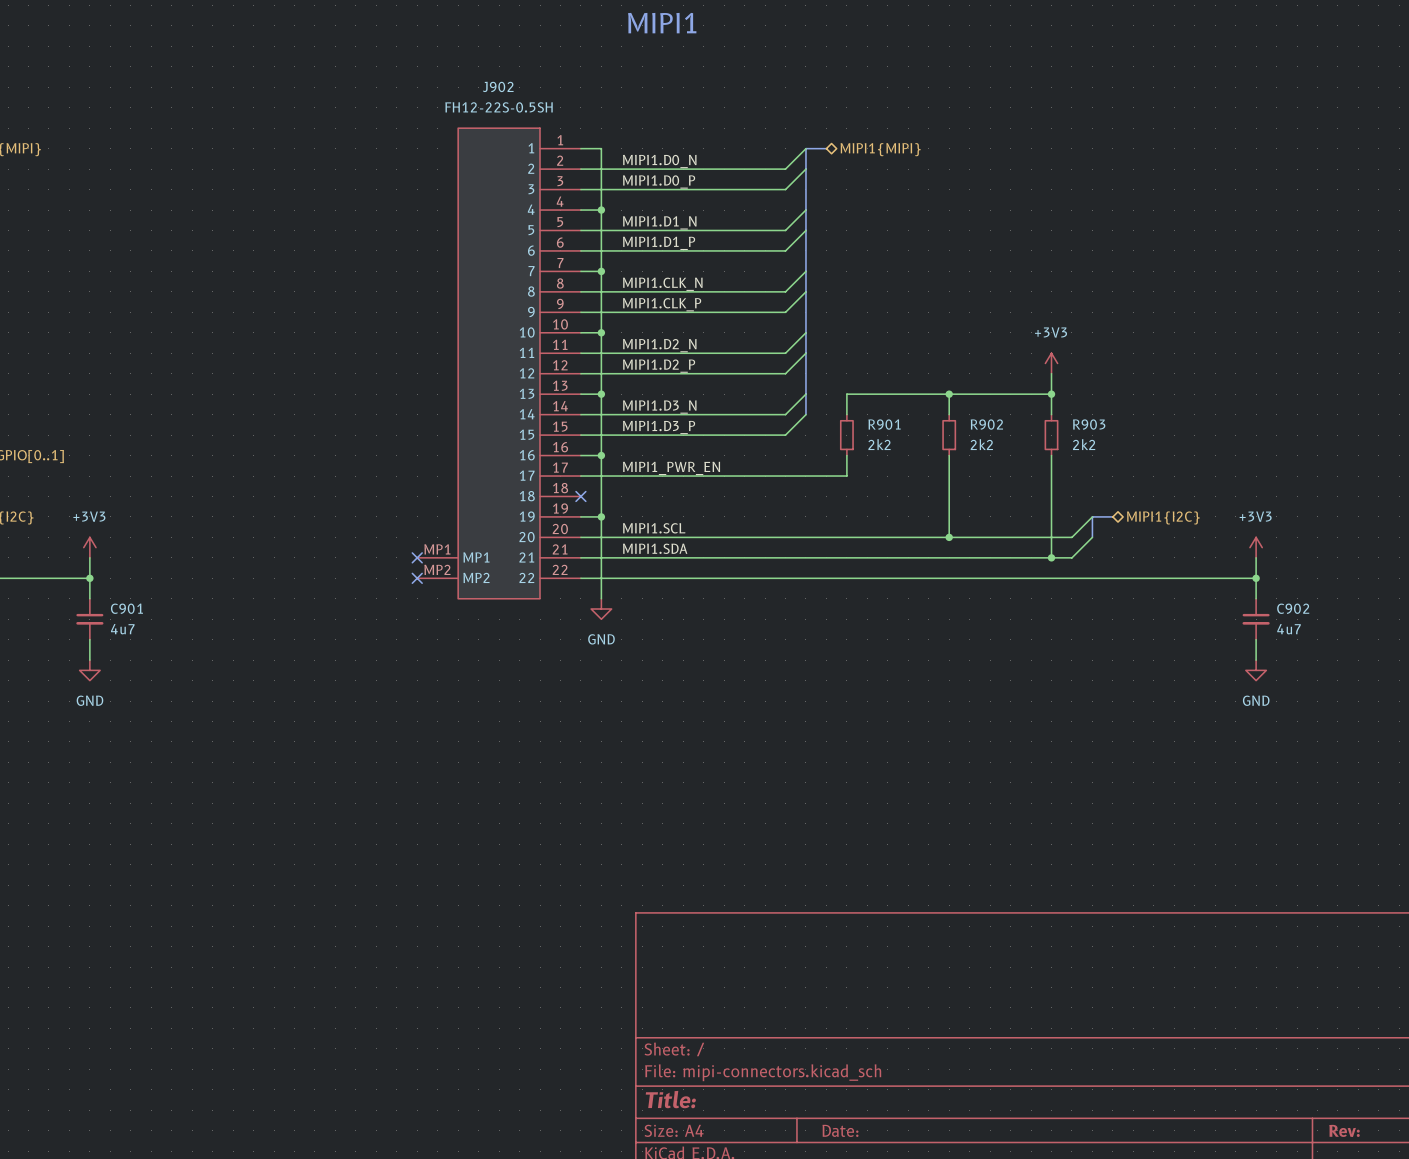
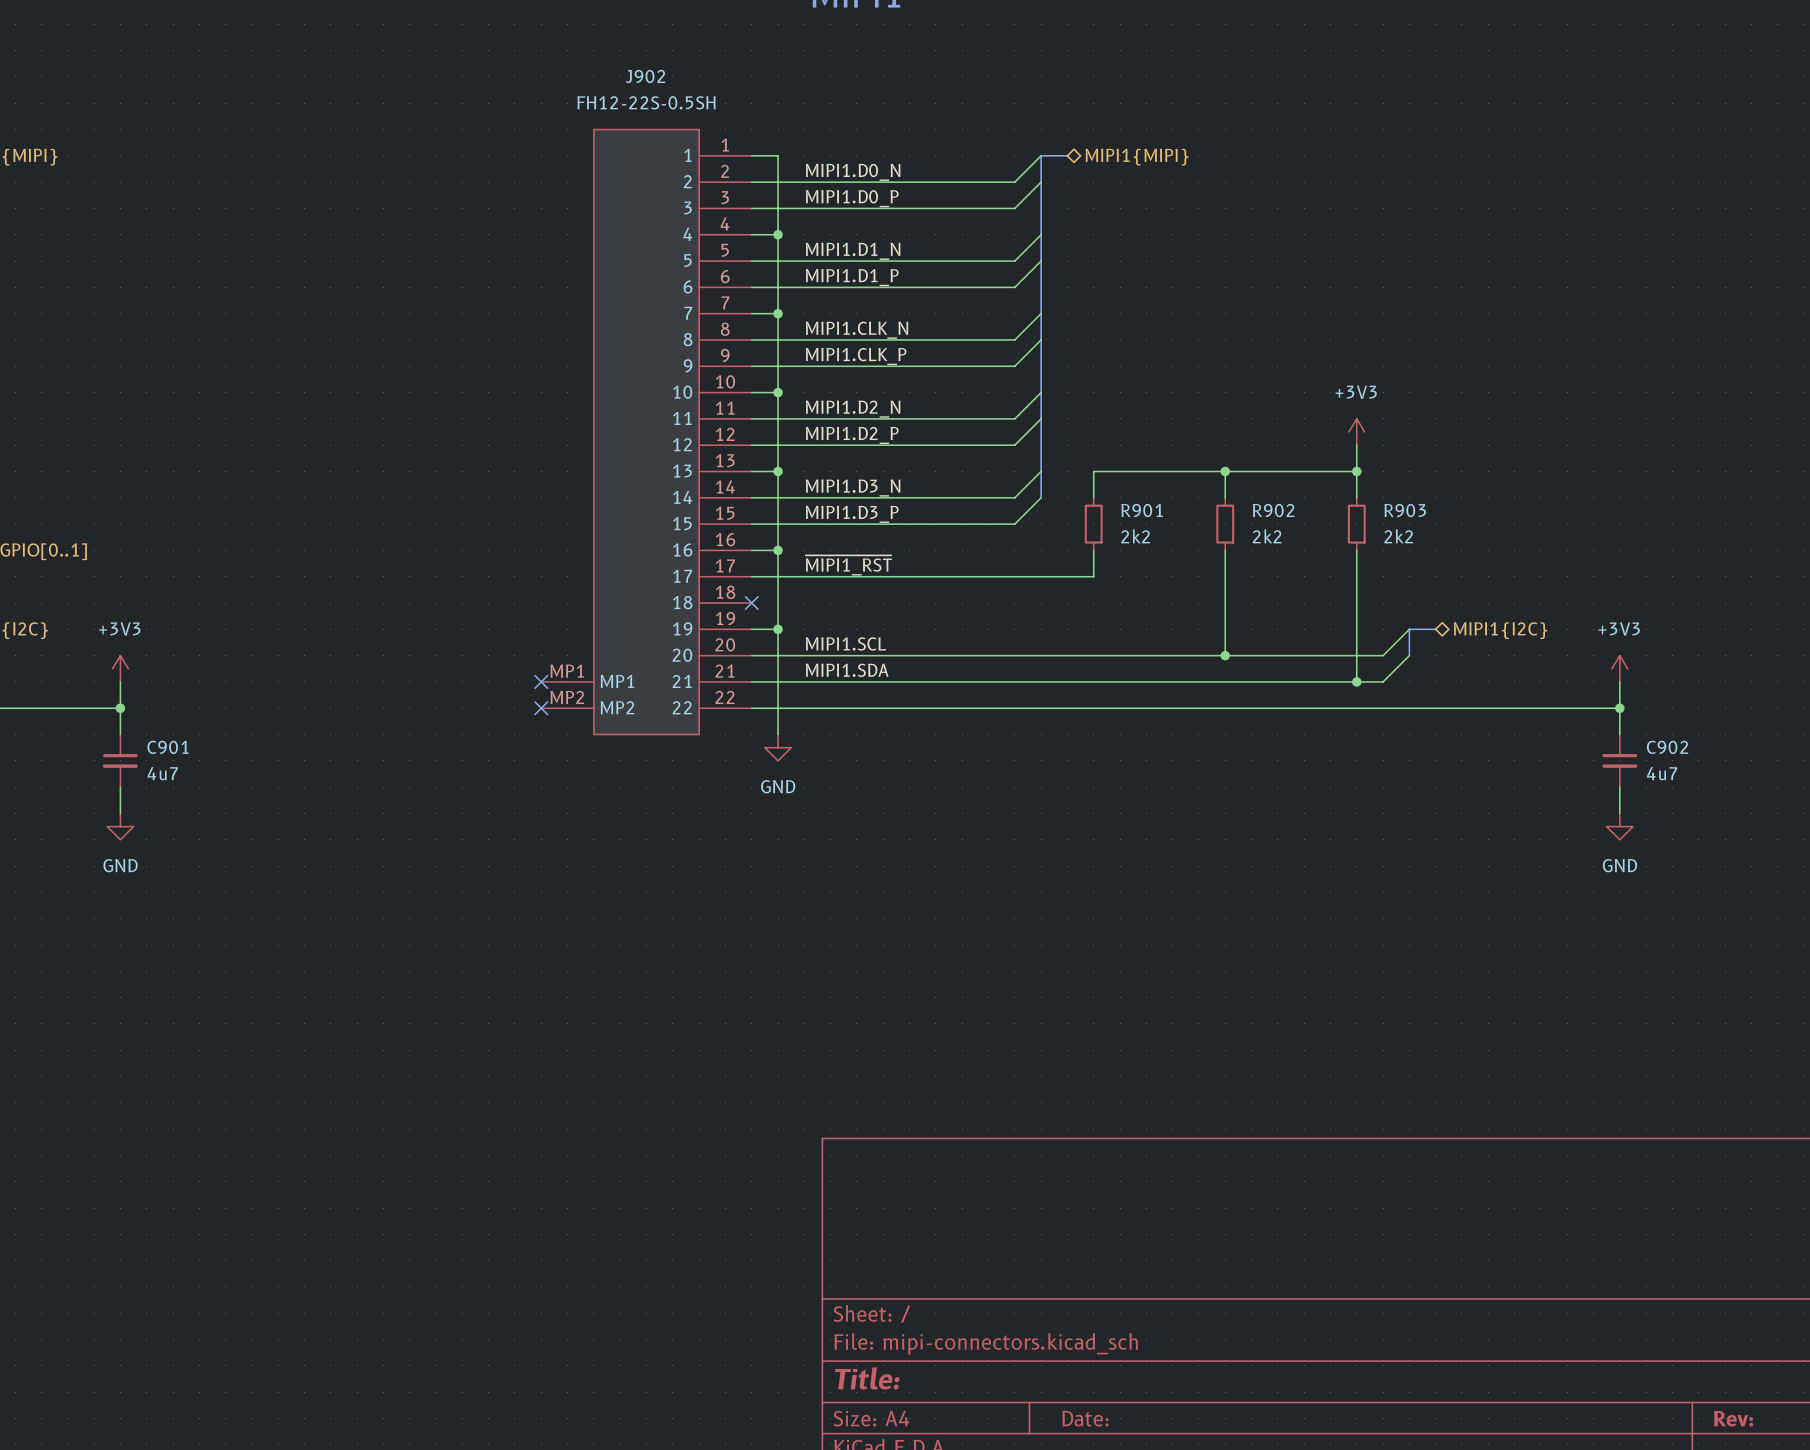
label: MIPI1_PWR_EN (671, 468) -> ~{MIPI1_RST} (848, 565)

